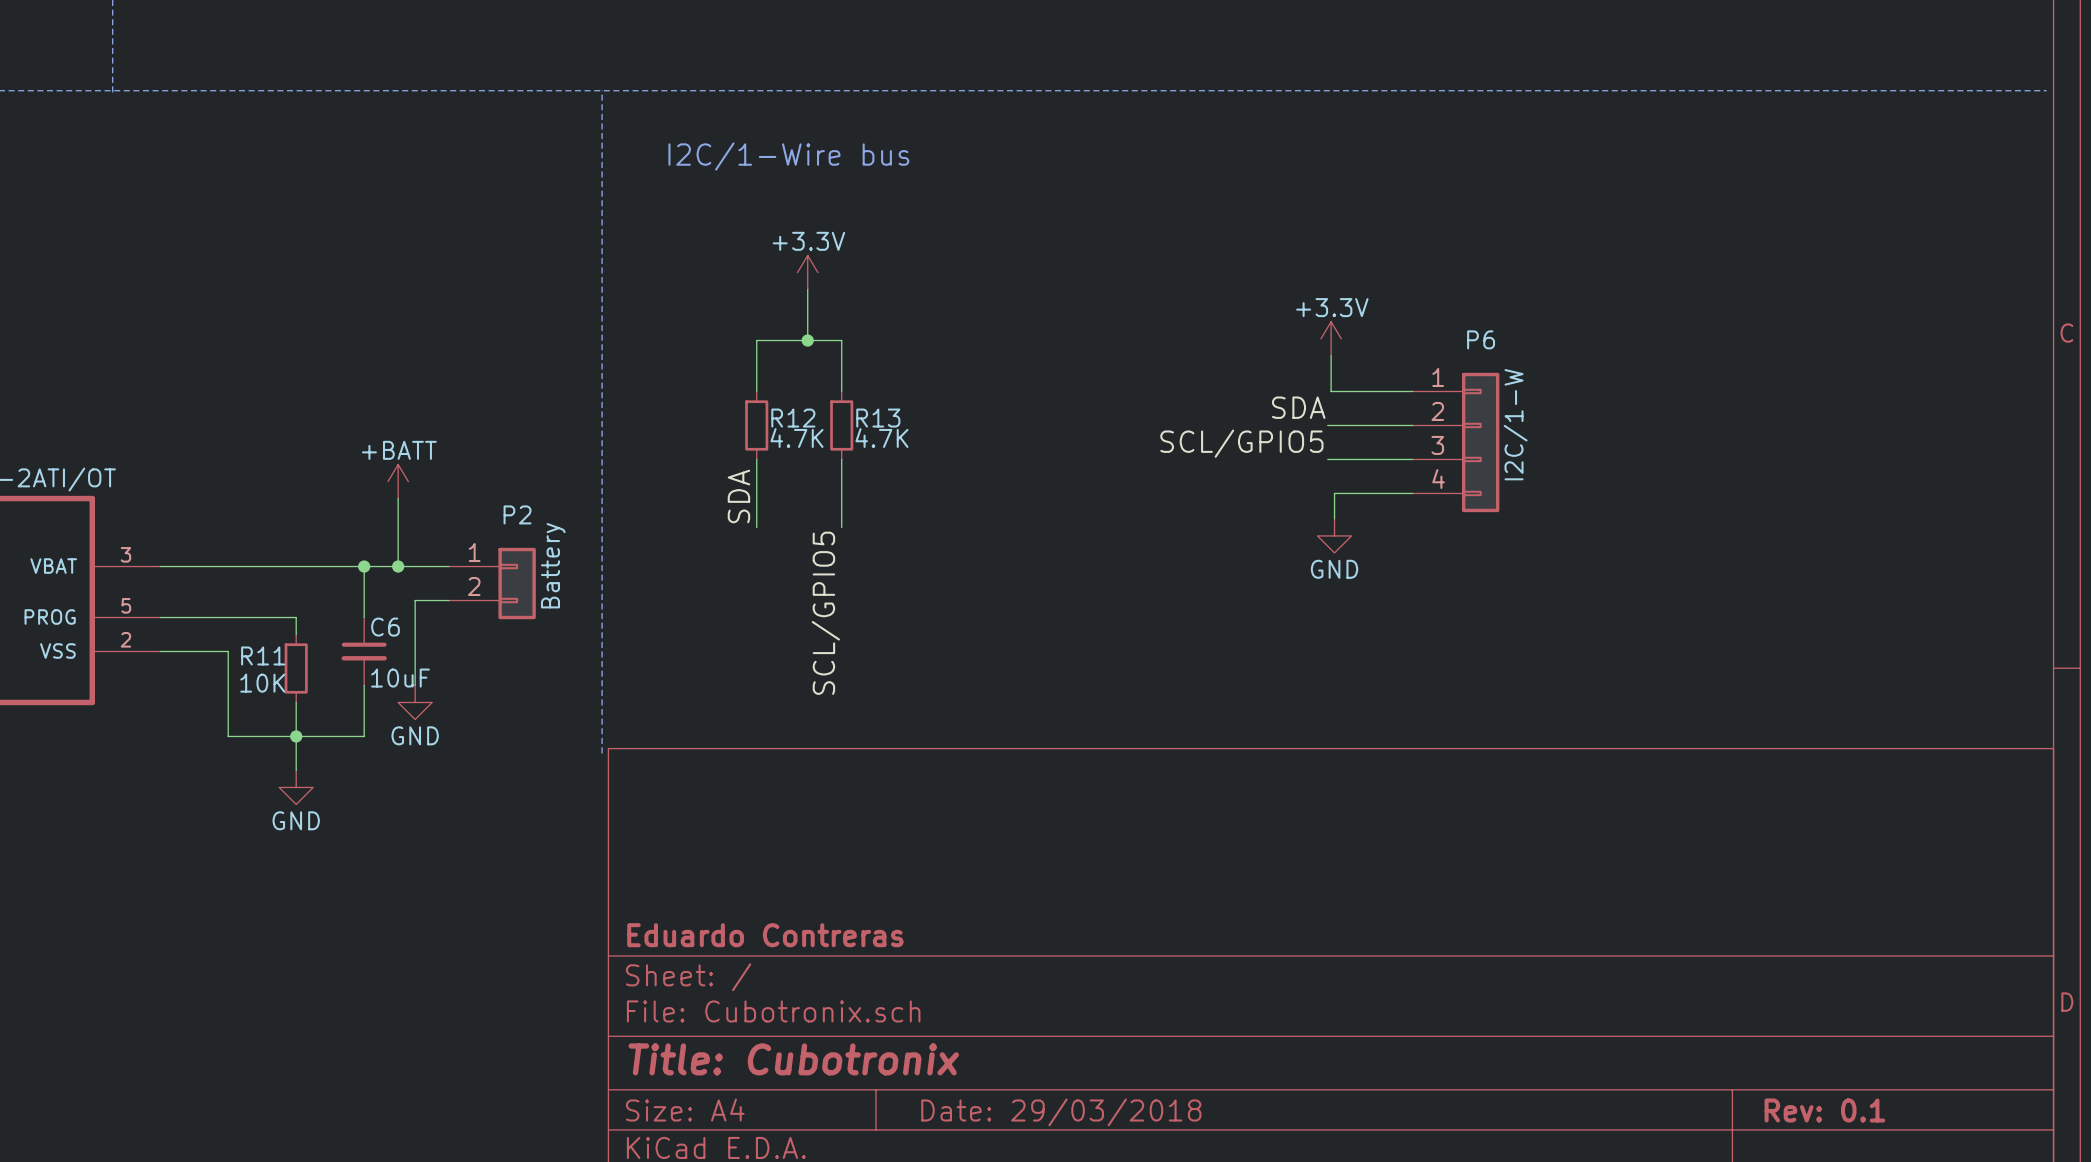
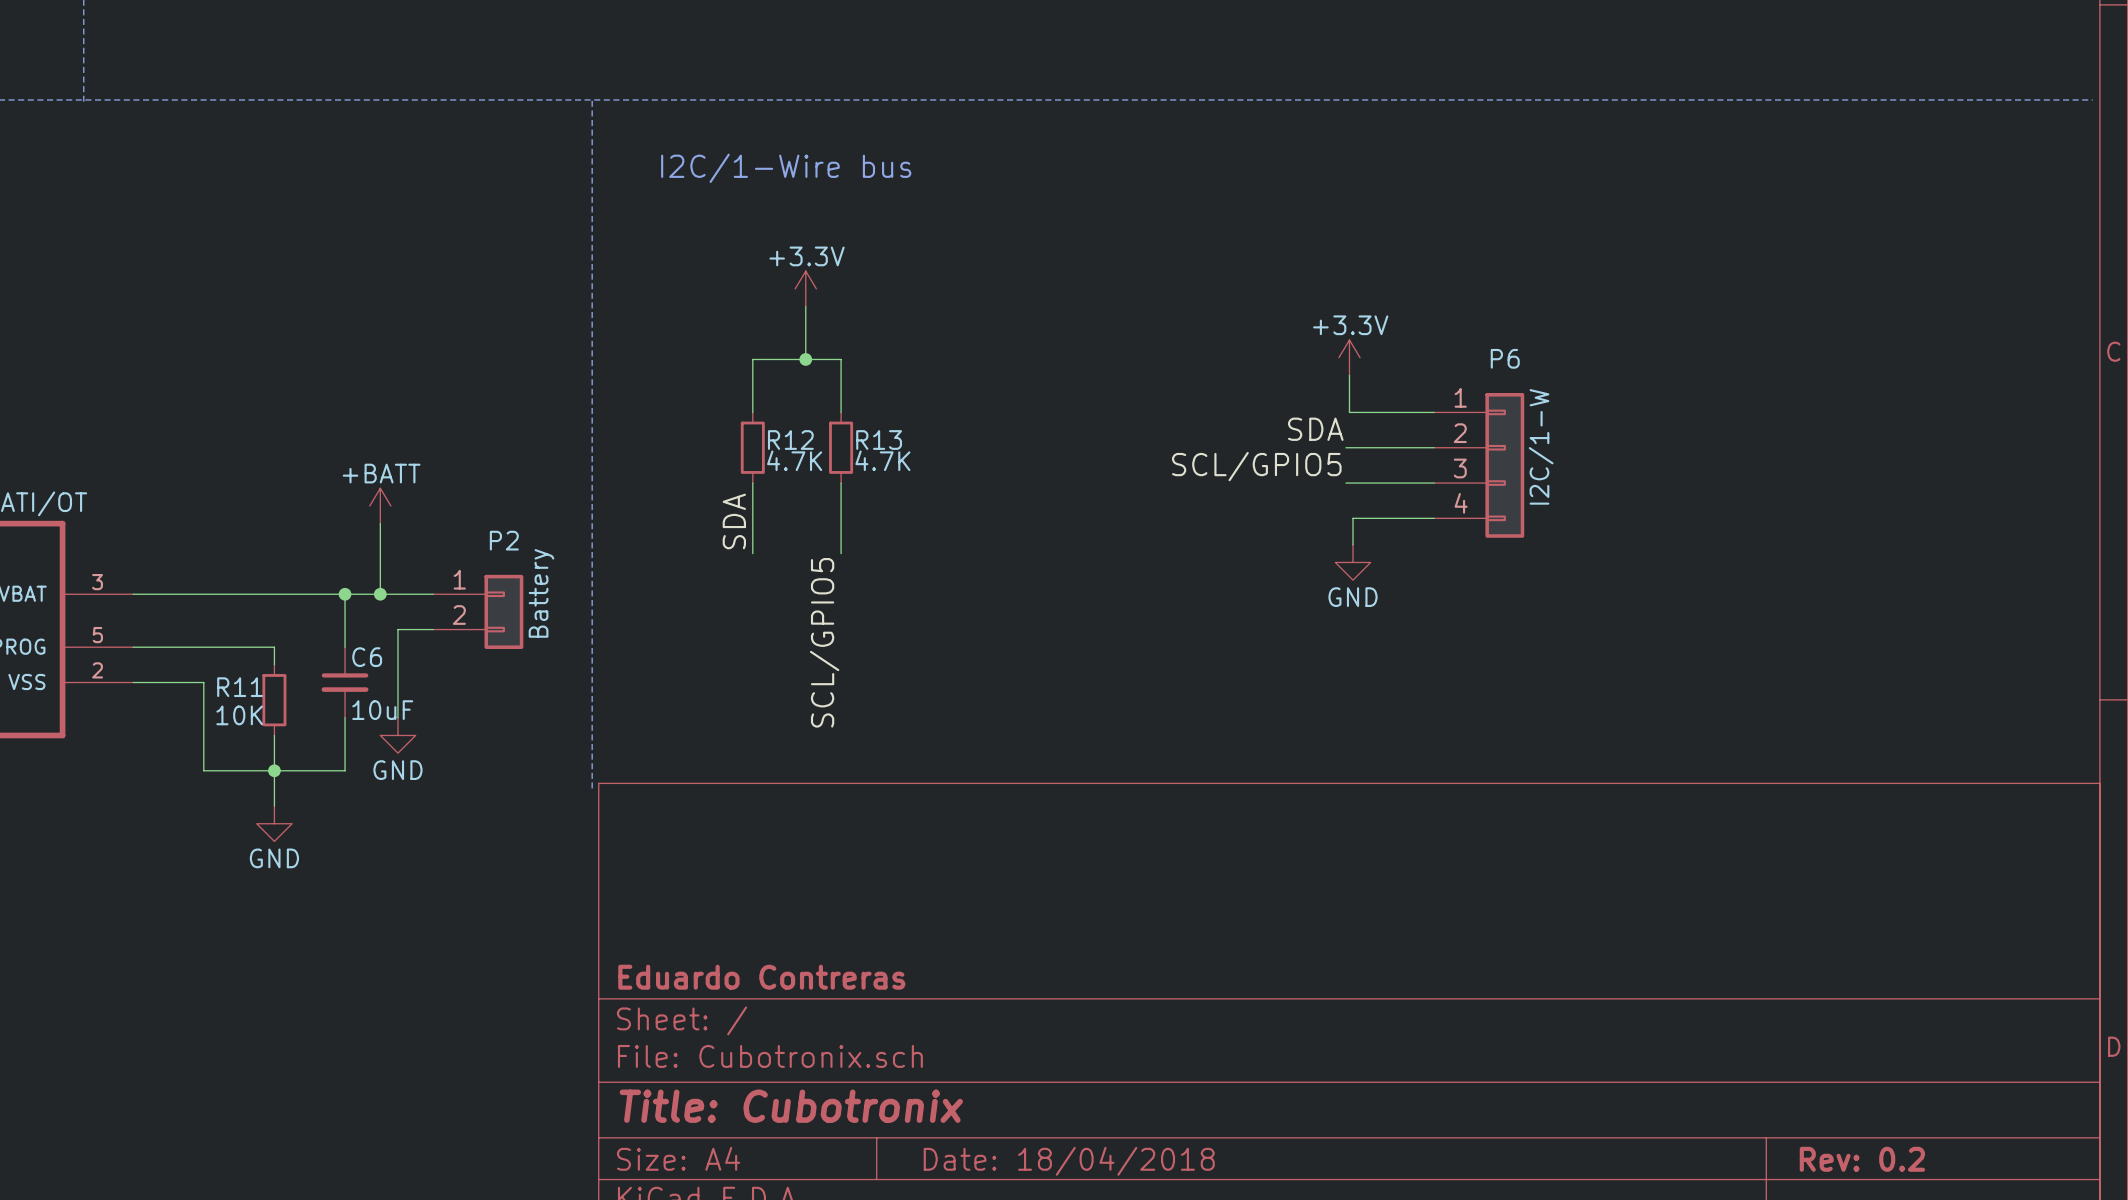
title block: Rev: 0.1 (1824, 1110) -> Rev: 0.2 (1862, 1159)
title block: Date: 29/03/2018 (1061, 1112) -> Date: 18/04/2018 (1069, 1161)

